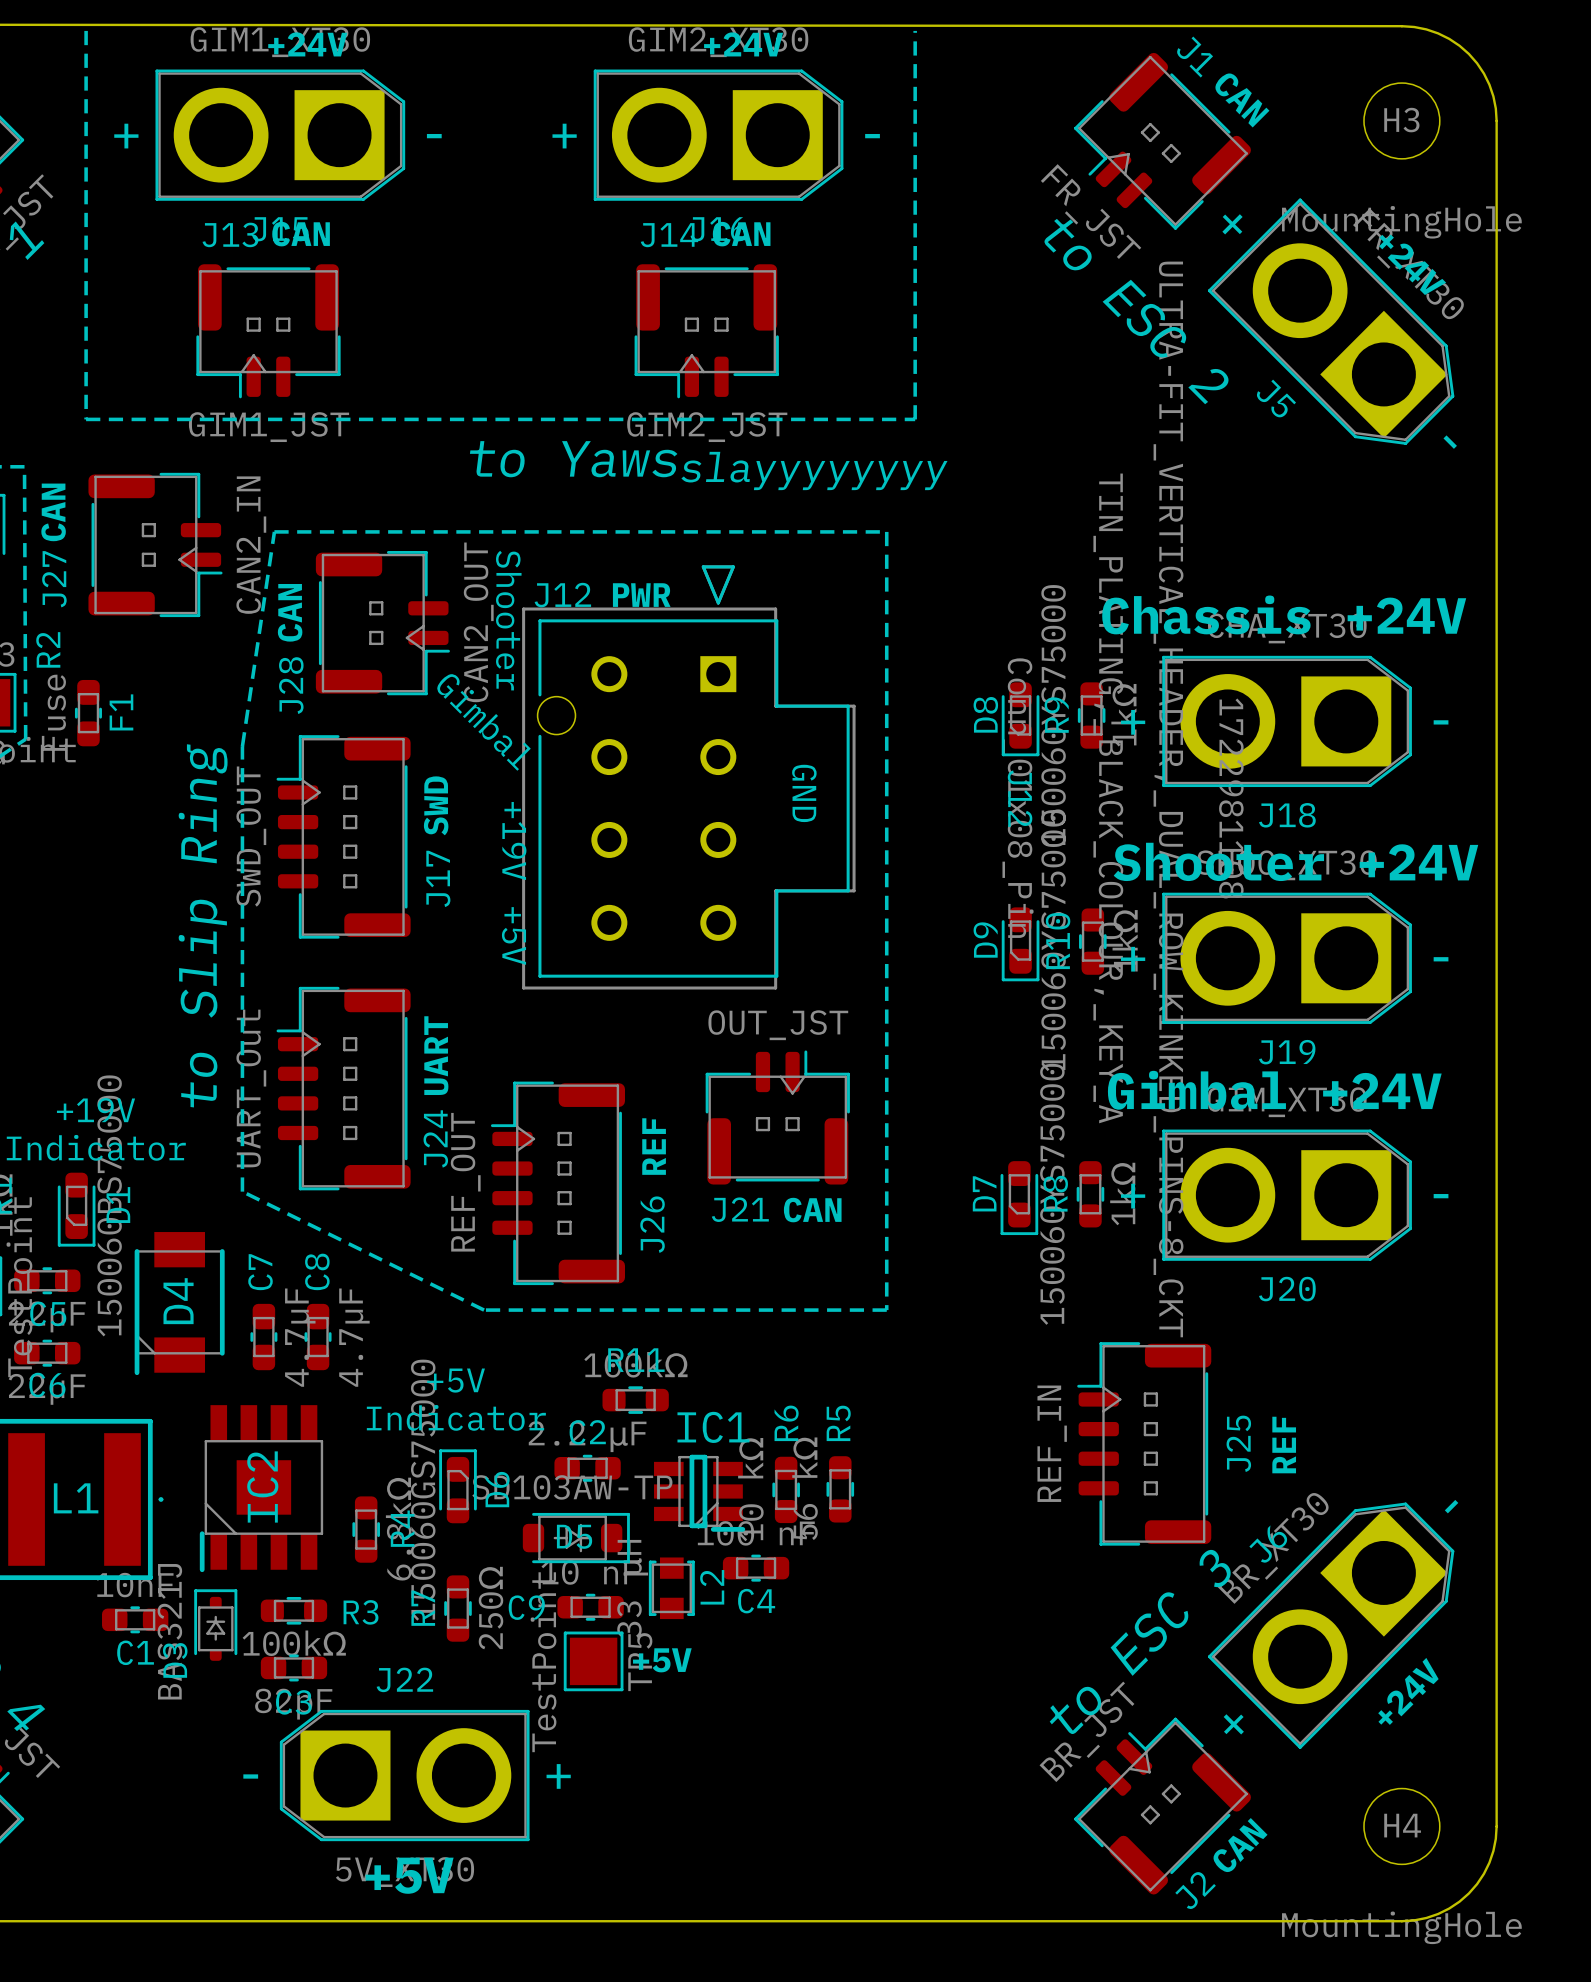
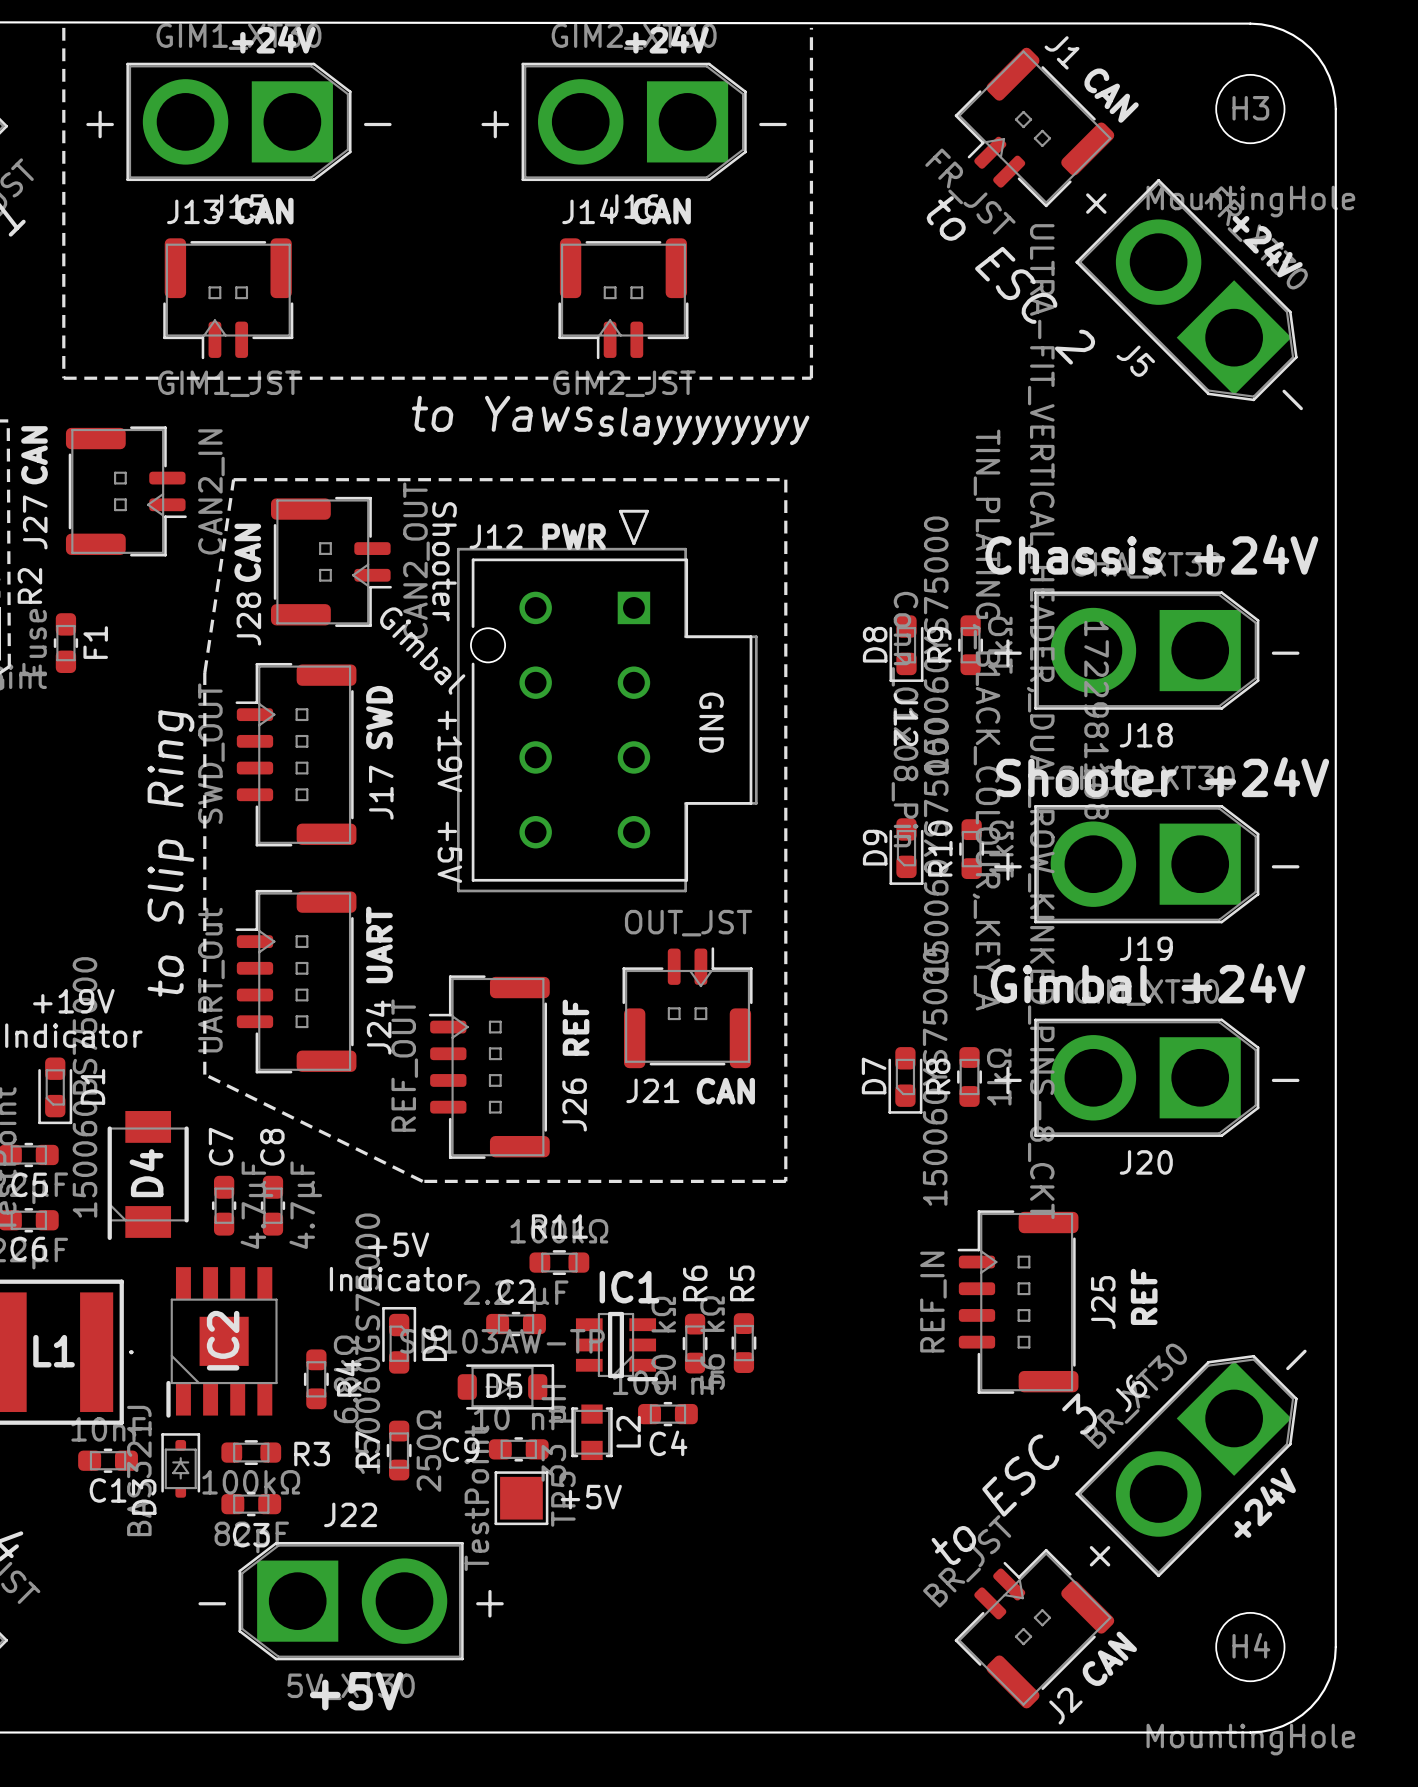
text position: +24V (1408, 1691) -> +24V (1265, 1502)

